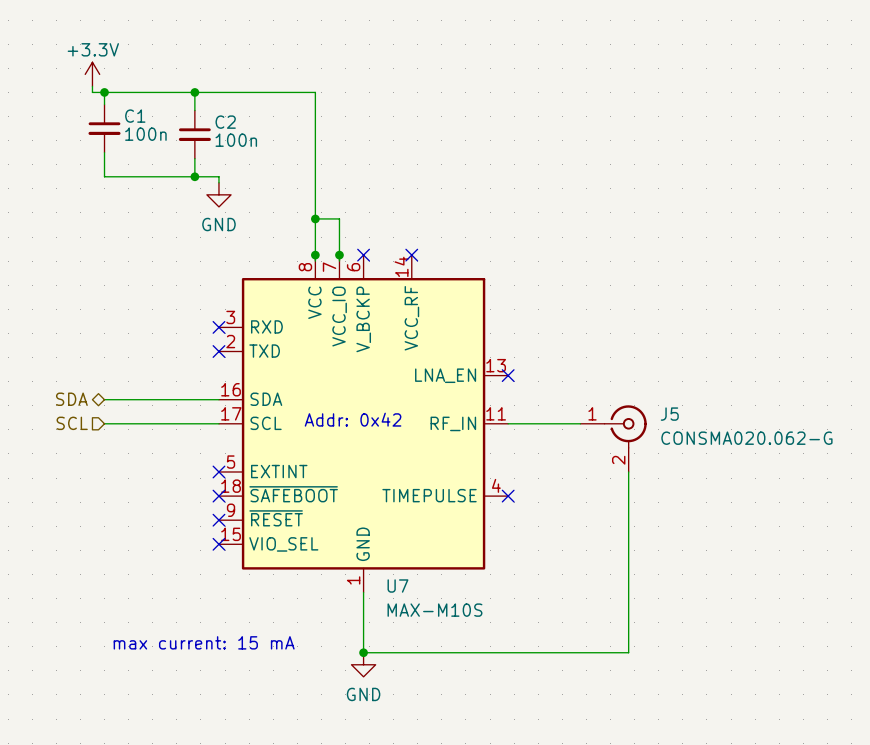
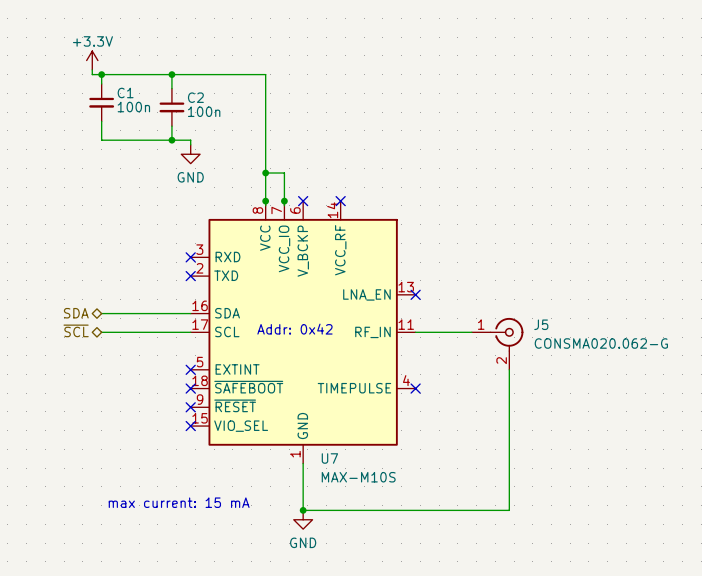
hierarchical label shape: input (72, 423) -> bidirectional (76, 330)
hierarchical label: SCL (72, 423) -> ~{SCL} (76, 330)

